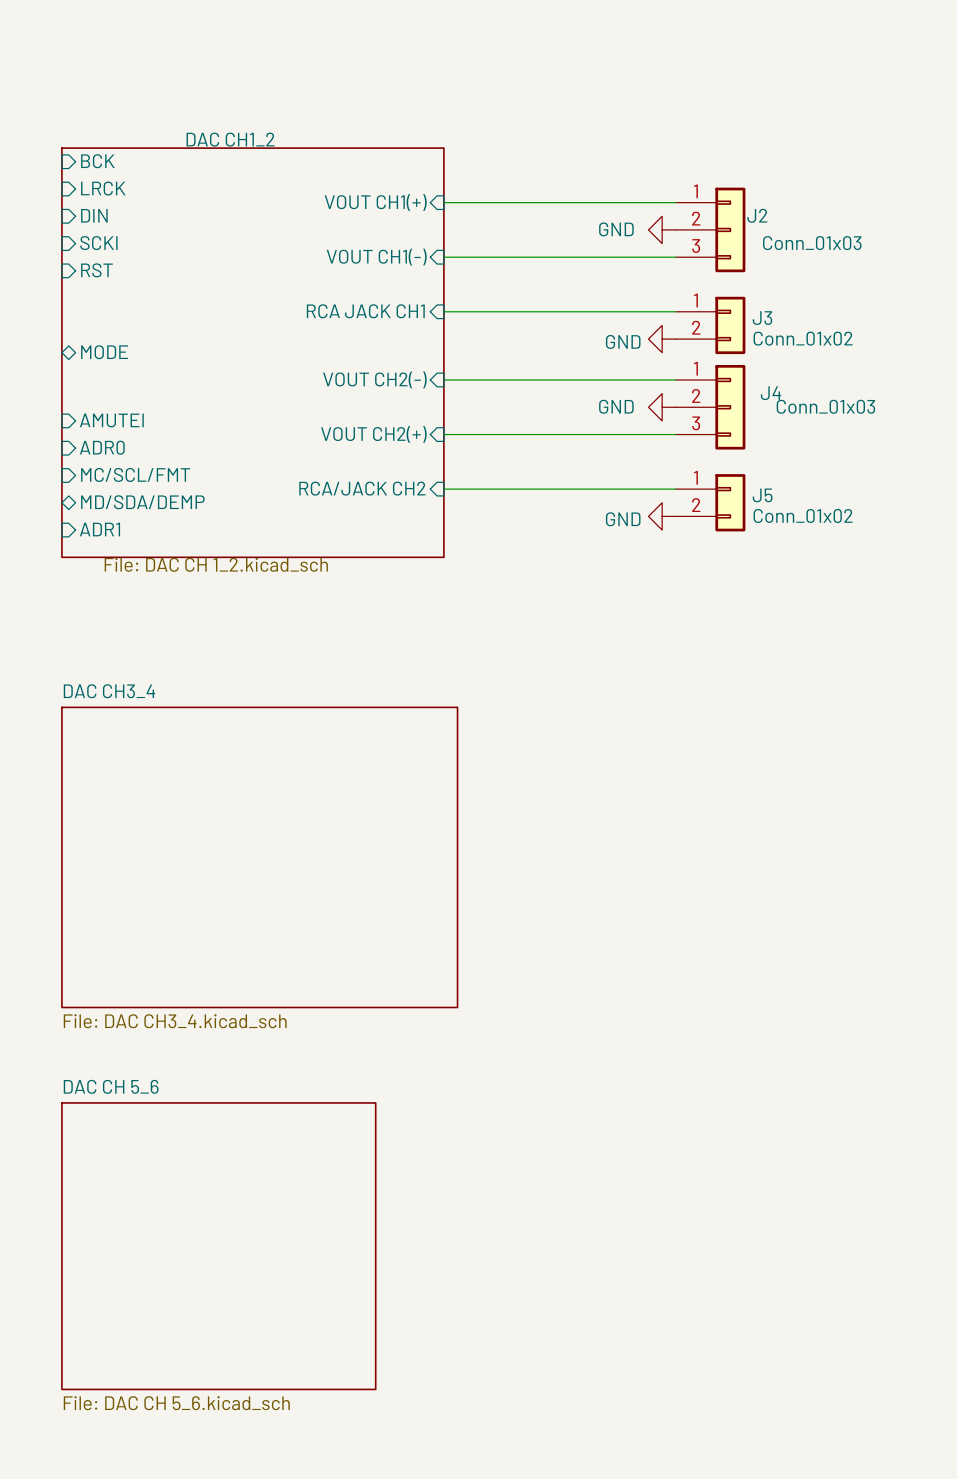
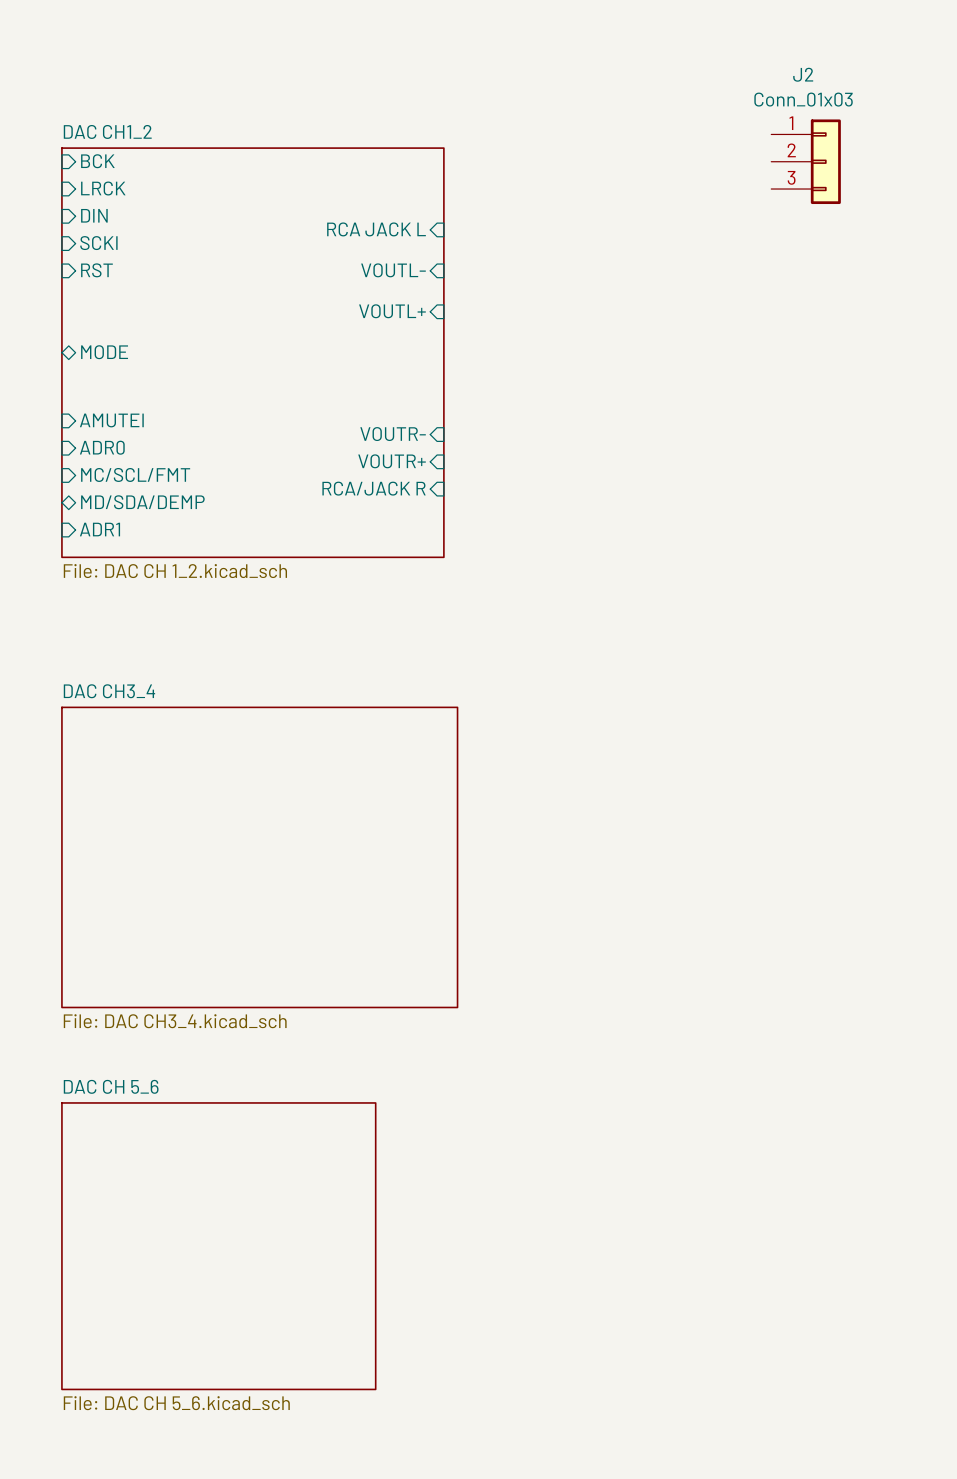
sheet DAC CH1_2 name position: DAC CH1_2 (230, 139) -> DAC CH1_2 (107, 131)
sheet pin: VOUT CH1(+) (375, 202) -> none
wire: (443, 202) (675, 202) -> none
J2 name position: J2 (757, 215) -> J2 (803, 74)
sheet pin: none -> RCA JACK L (376, 229)
power symbol: GND (662, 229) -> none
J2 position: (710, 229) -> (806, 161)
J2 value position: Conn_01x03 (812, 243) -> Conn_01x03 (803, 99)
sheet pin: VOUT CH1(-) (376, 257) -> none
wire: (443, 257) (675, 257) -> none
sheet pin: none -> VOUTL- (393, 270)
sheet pin: RCA JACK CH1 (365, 311) -> VOUTL+ (392, 311)
wire: (443, 311) (675, 311) -> none
J3: Conn_01x02 (710, 325) -> none
power symbol: GND (662, 339) -> none
sheet pin: VOUT CH2(-) (374, 379) -> none
wire: (443, 379) (675, 379) -> none
power symbol: GND (662, 407) -> none
J4: Conn_01x03 (710, 407) -> none
sheet pin: VOUT CH2(+) (373, 434) -> VOUTR- (393, 434)
wire: (443, 434) (675, 434) -> none
sheet pin: none -> VOUTR+ (392, 461)
sheet pin: RCA/JACK CH2 (362, 488) -> RCA/JACK R (374, 488)
wire: (443, 489) (675, 489) -> none
J5: Conn_01x02 (710, 502) -> none
power symbol: GND (662, 516) -> none
sheet DAC CH1_2 value position: File: DAC CH 1_2.kicad_sch (216, 564) -> File: DAC CH 1_2.kicad_sch (175, 571)

